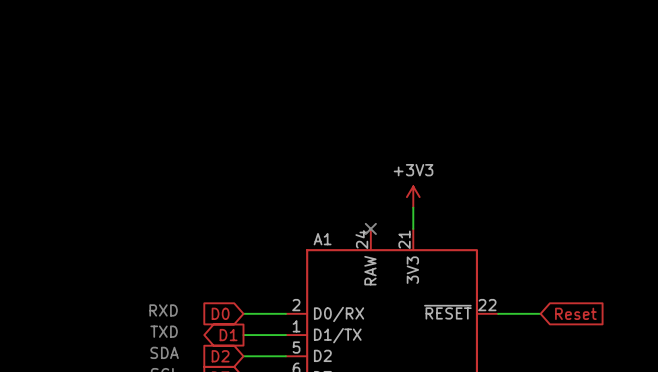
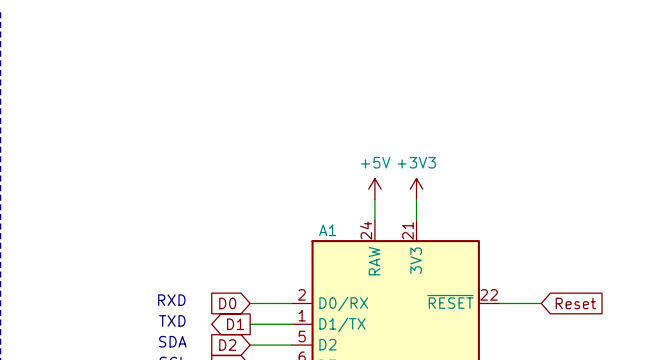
power symbol: none -> +5V (374, 189)
wire: none -> (374, 199) (374, 220)
no-connect mark: (370, 228) -> none

